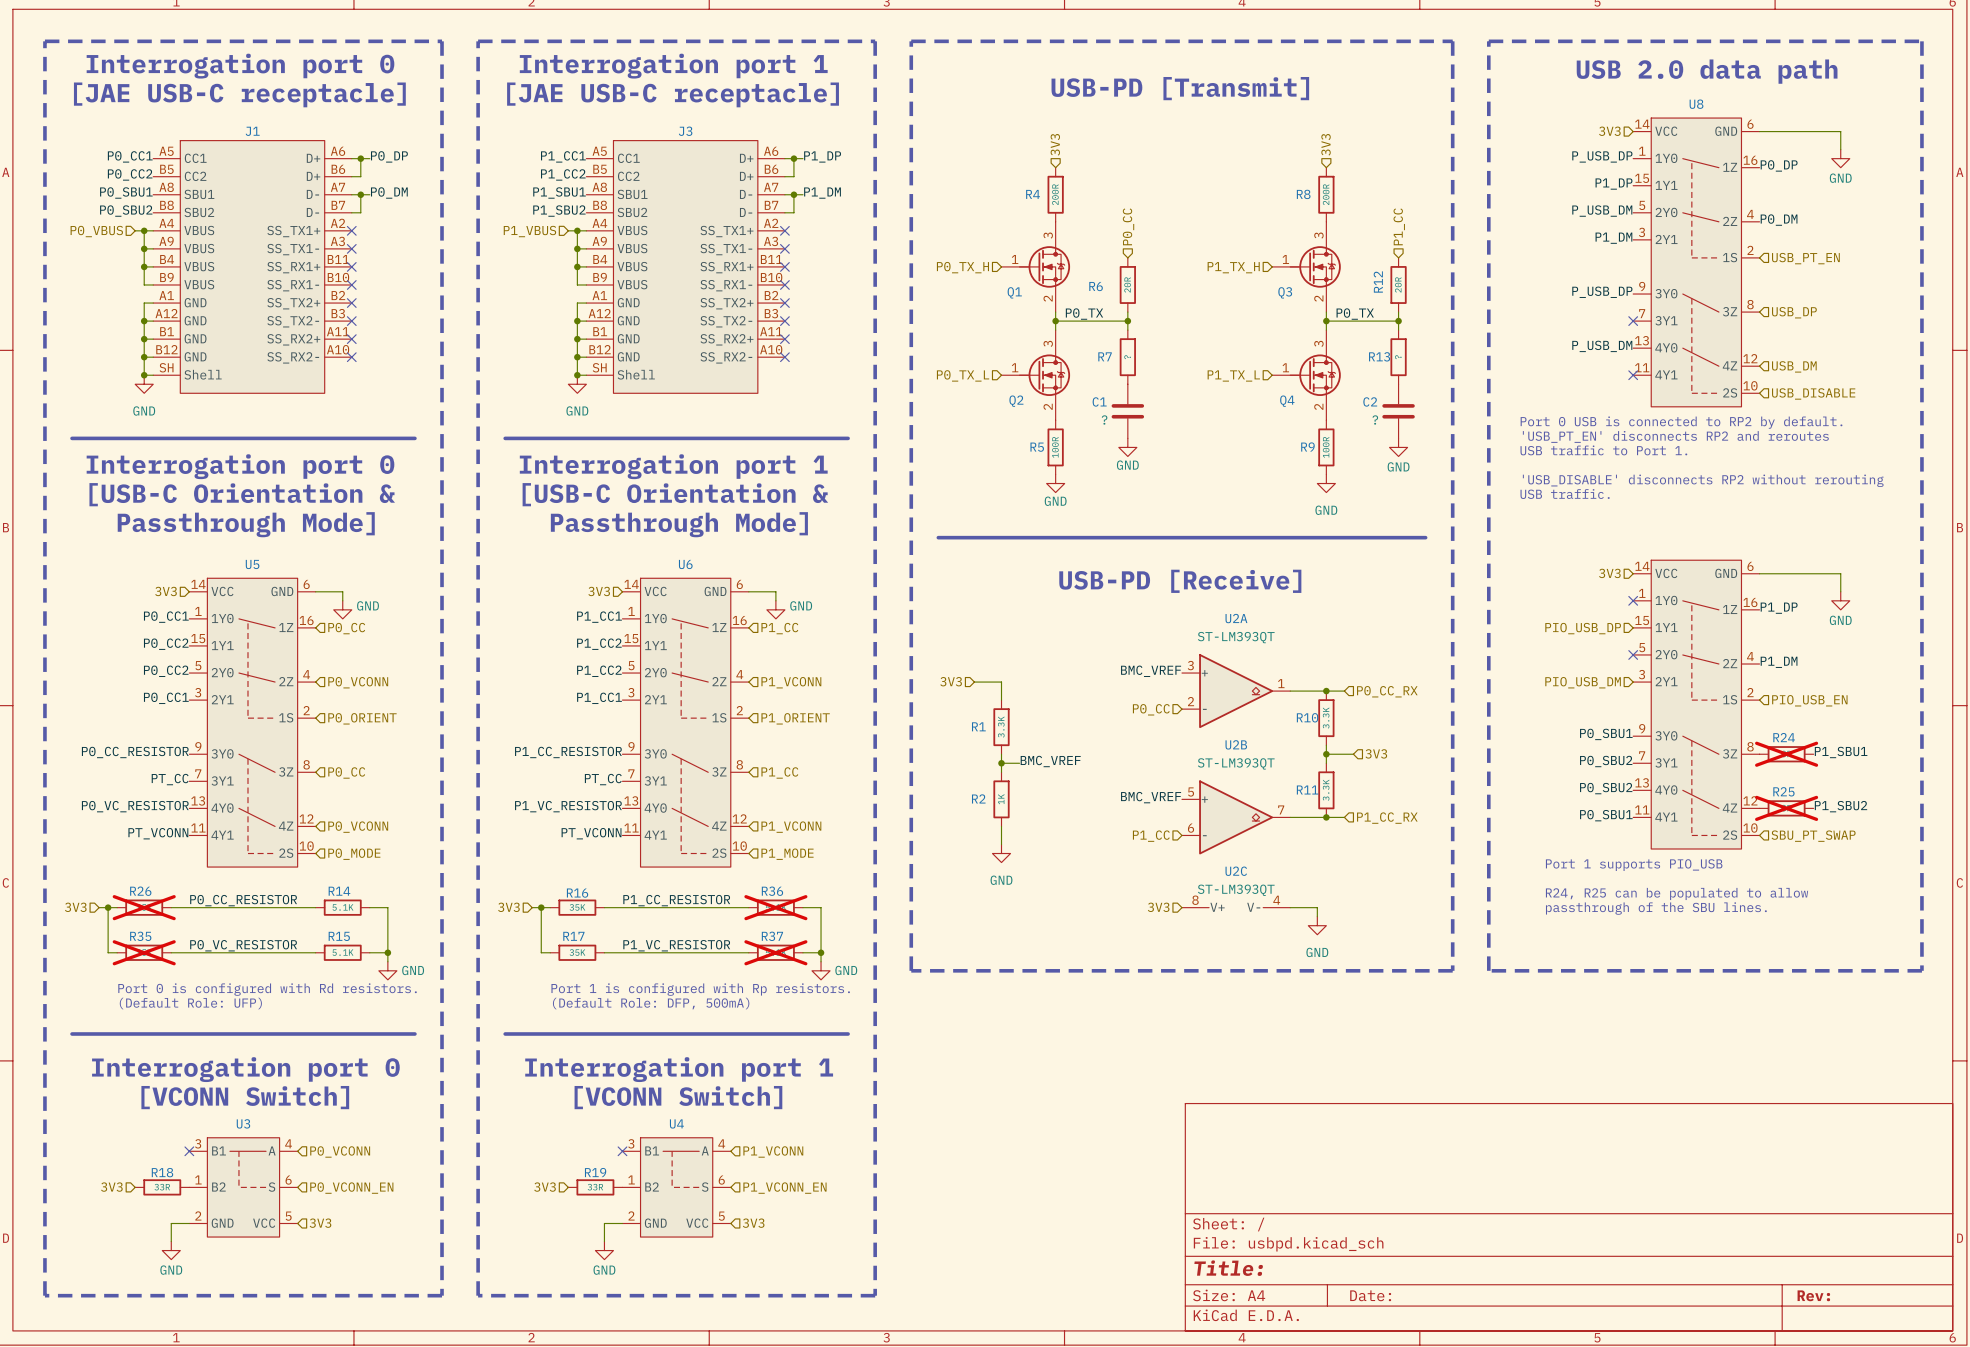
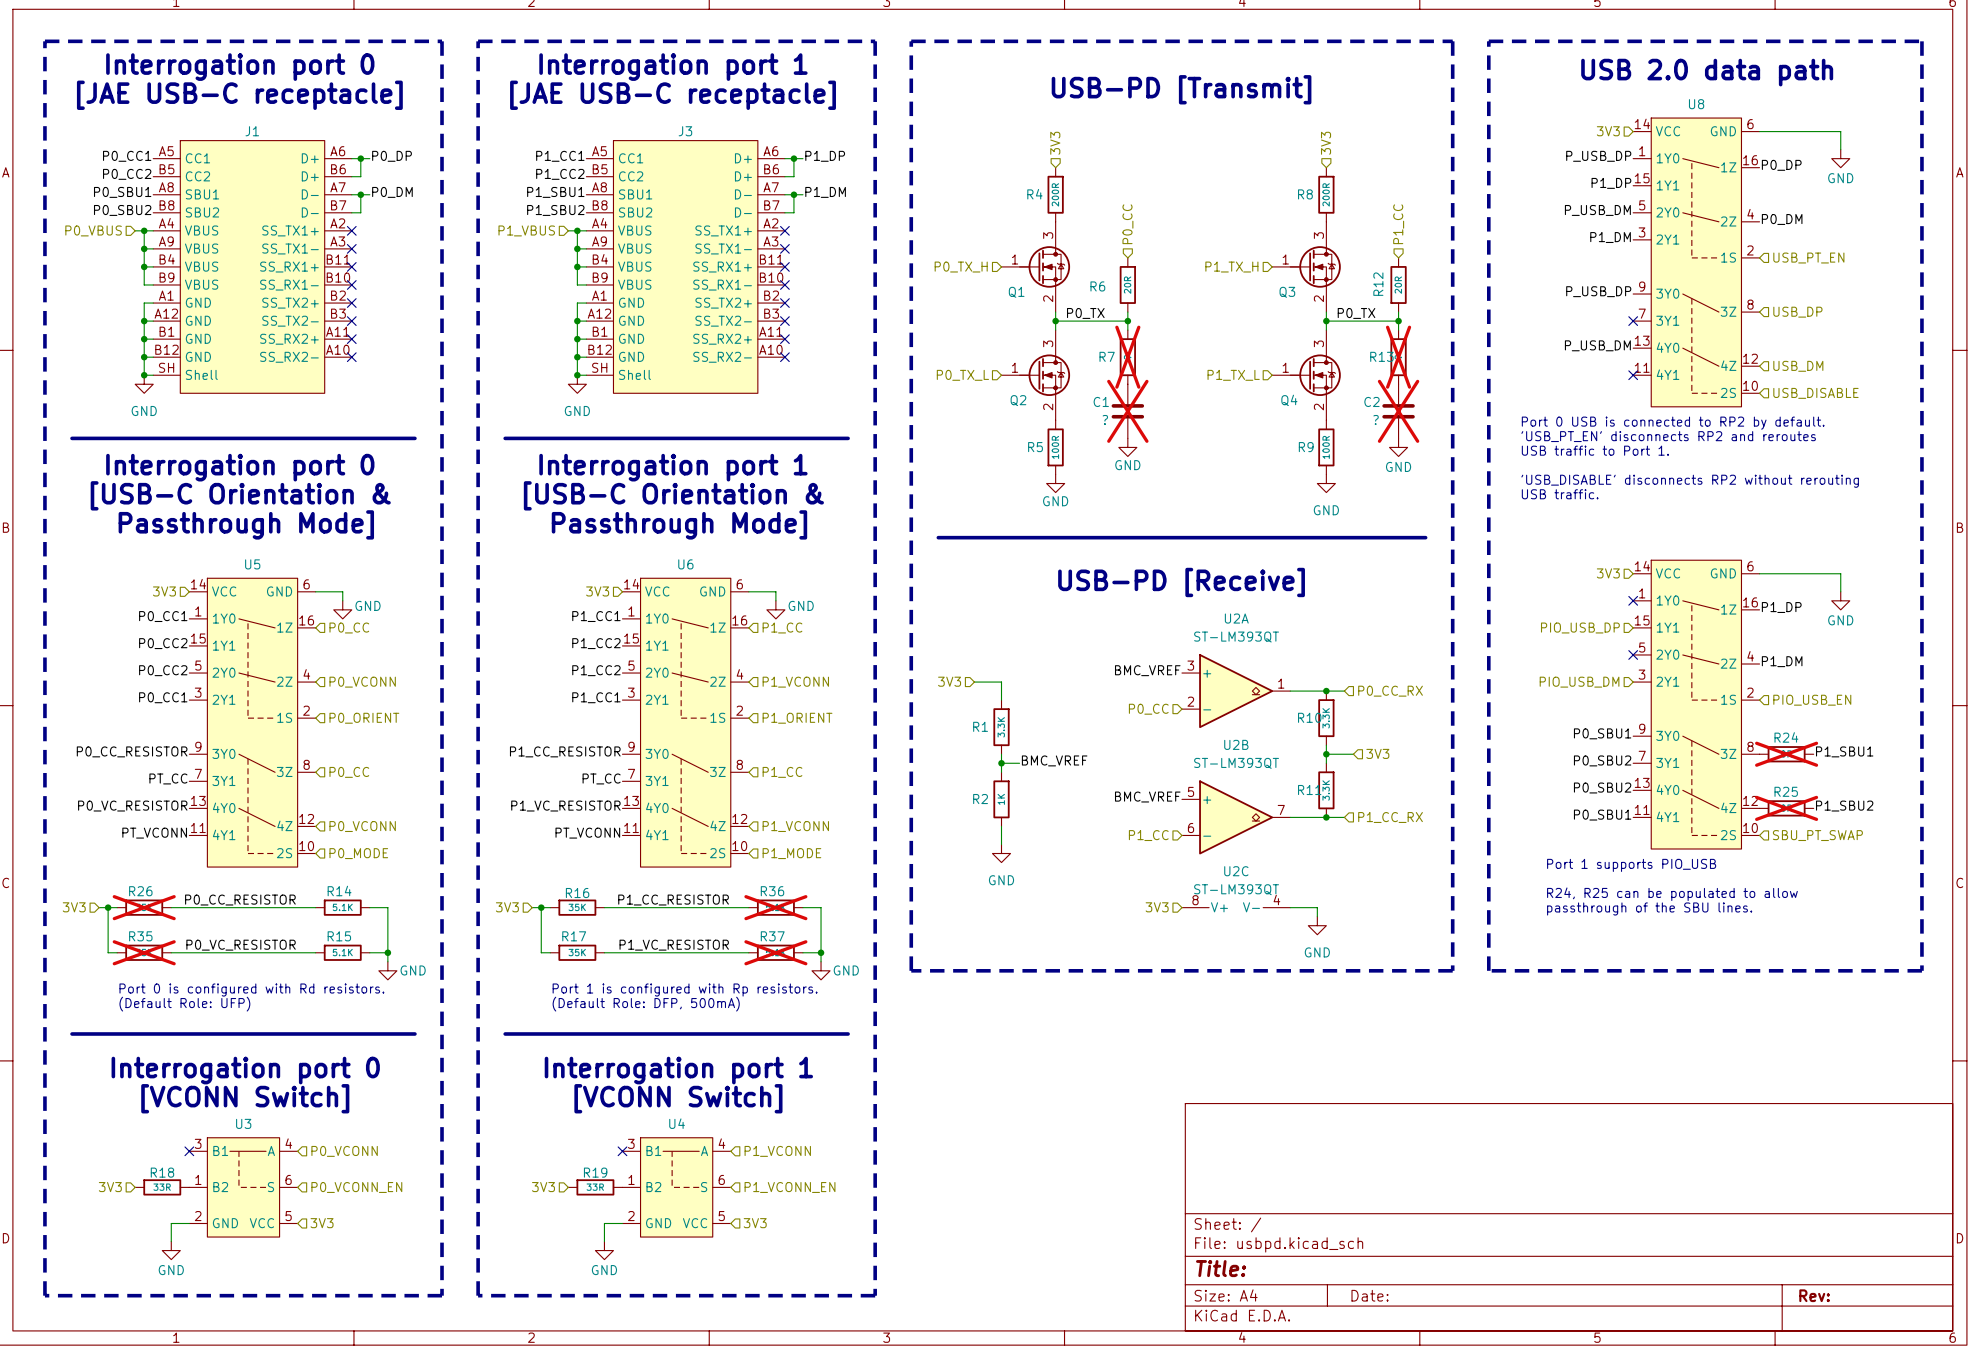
R7 do-not-place cross: none -> (1127, 357)
R13 do-not-place cross: none -> (1398, 357)
C1 do-not-place cross: none -> (1127, 411)
C2 do-not-place cross: none -> (1398, 411)

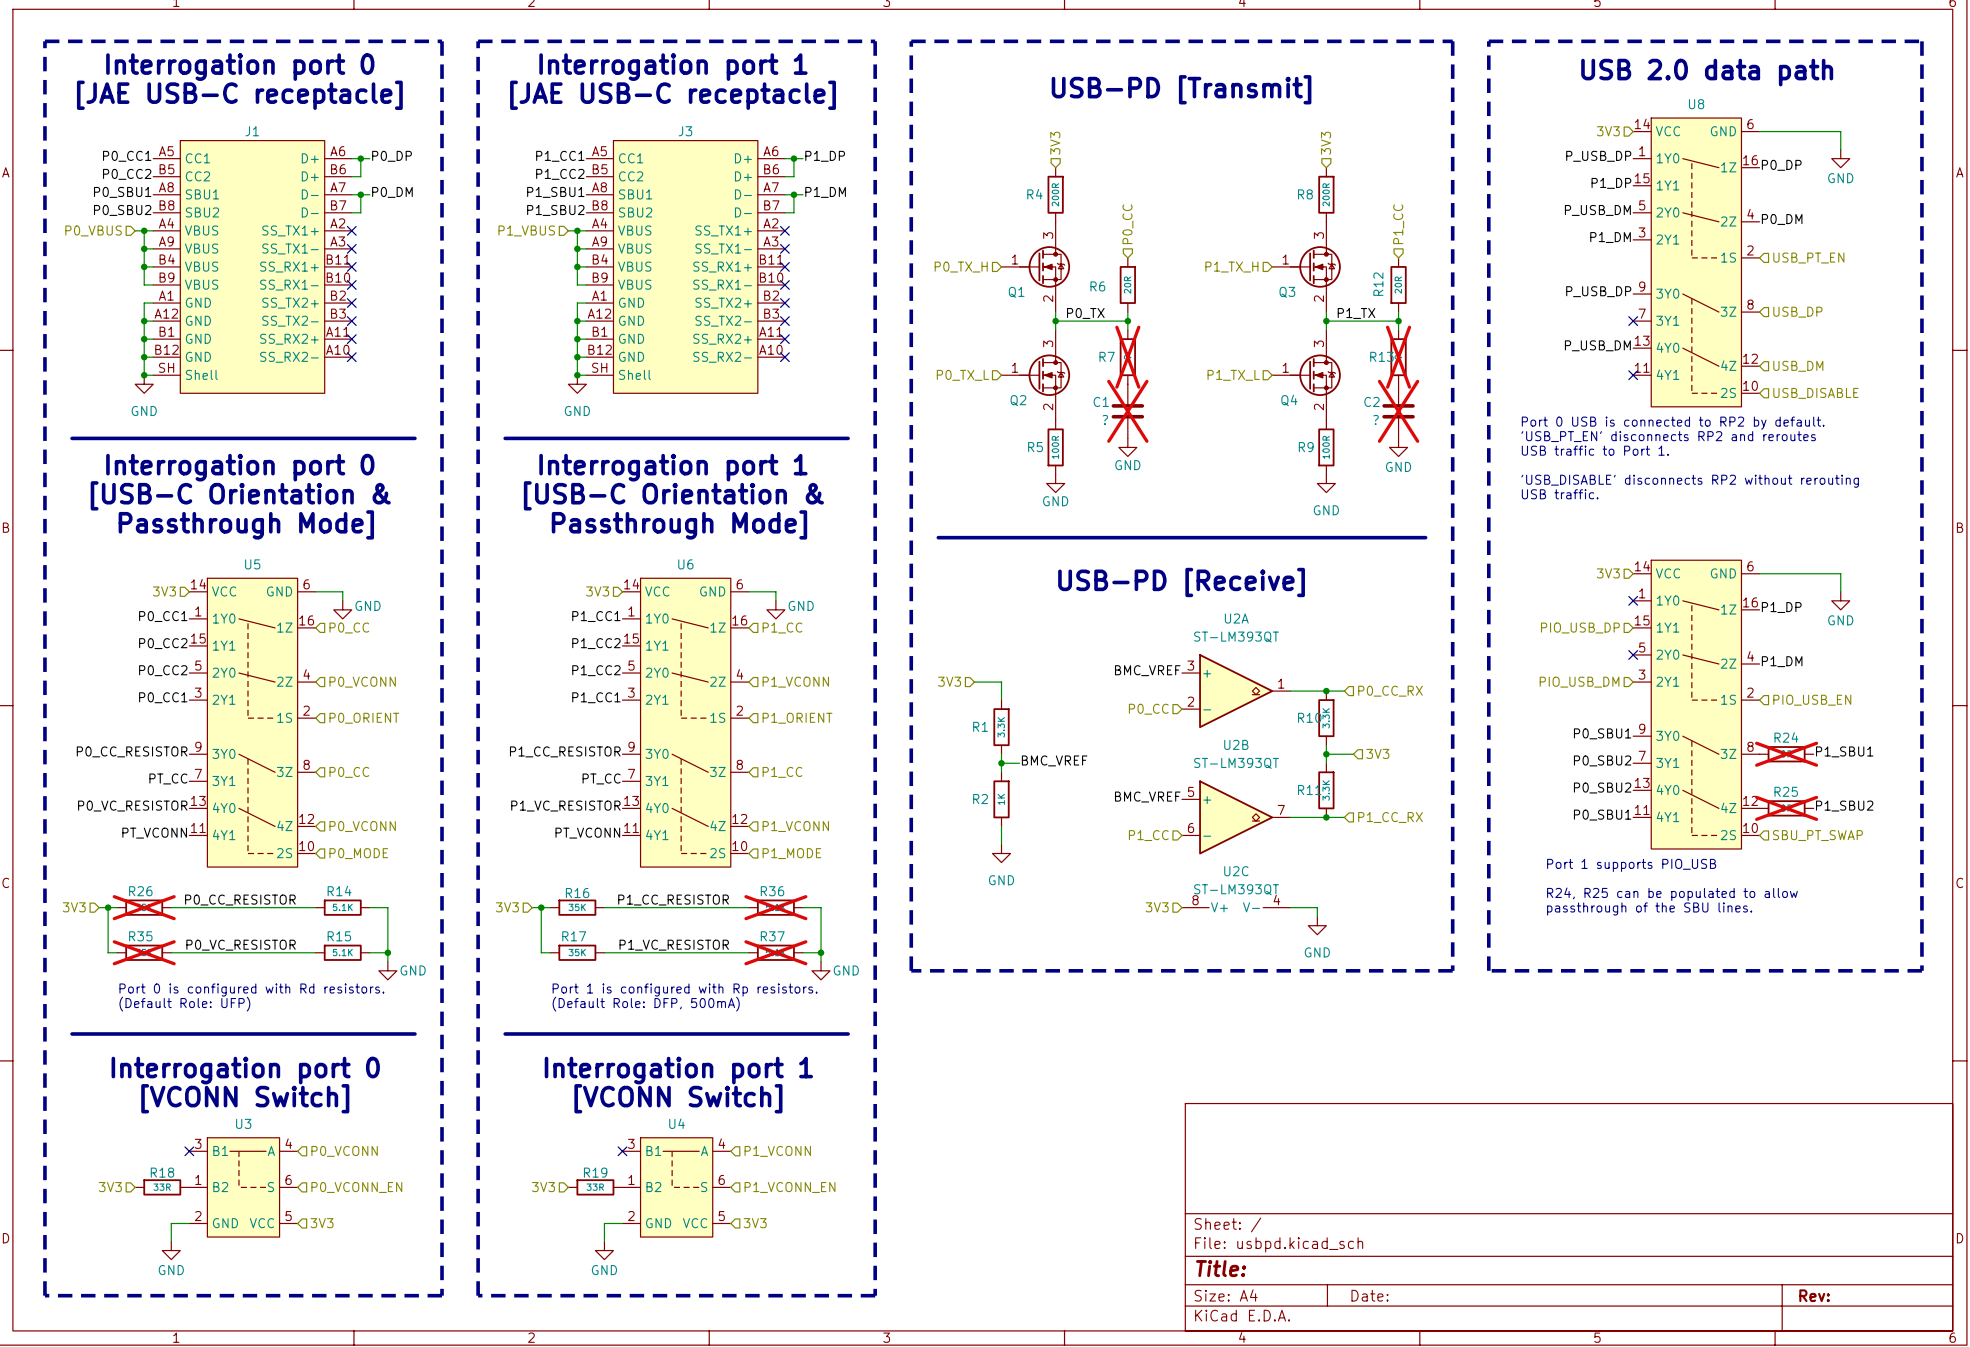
label: P0_TX (1356, 313) -> P1_TX (1356, 313)

